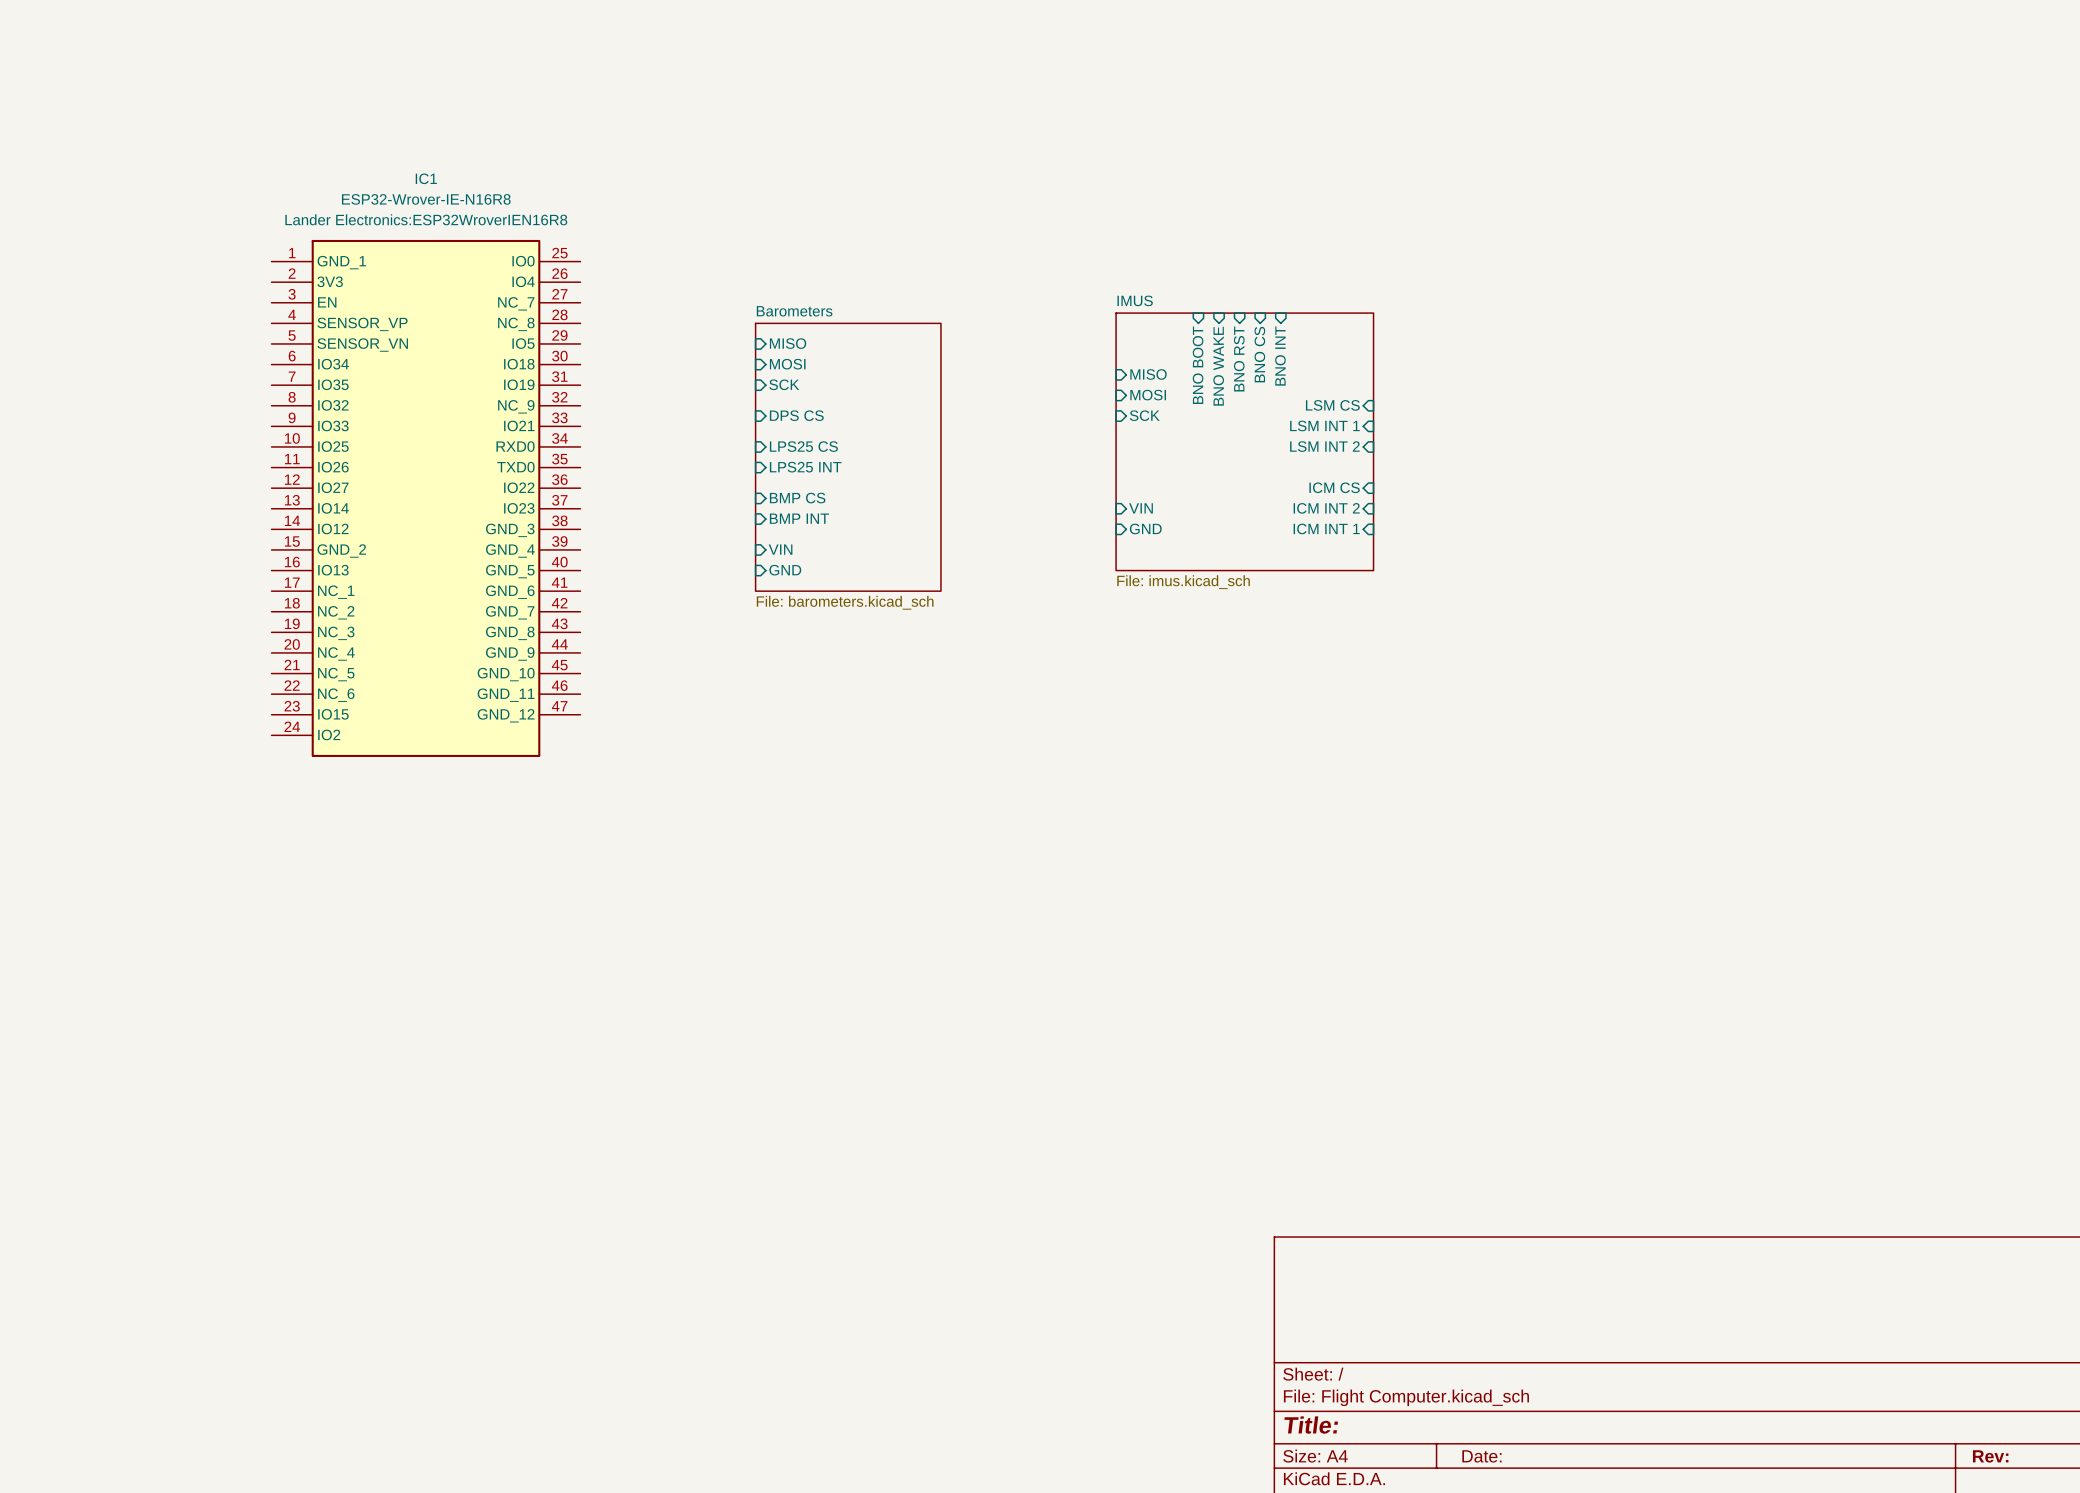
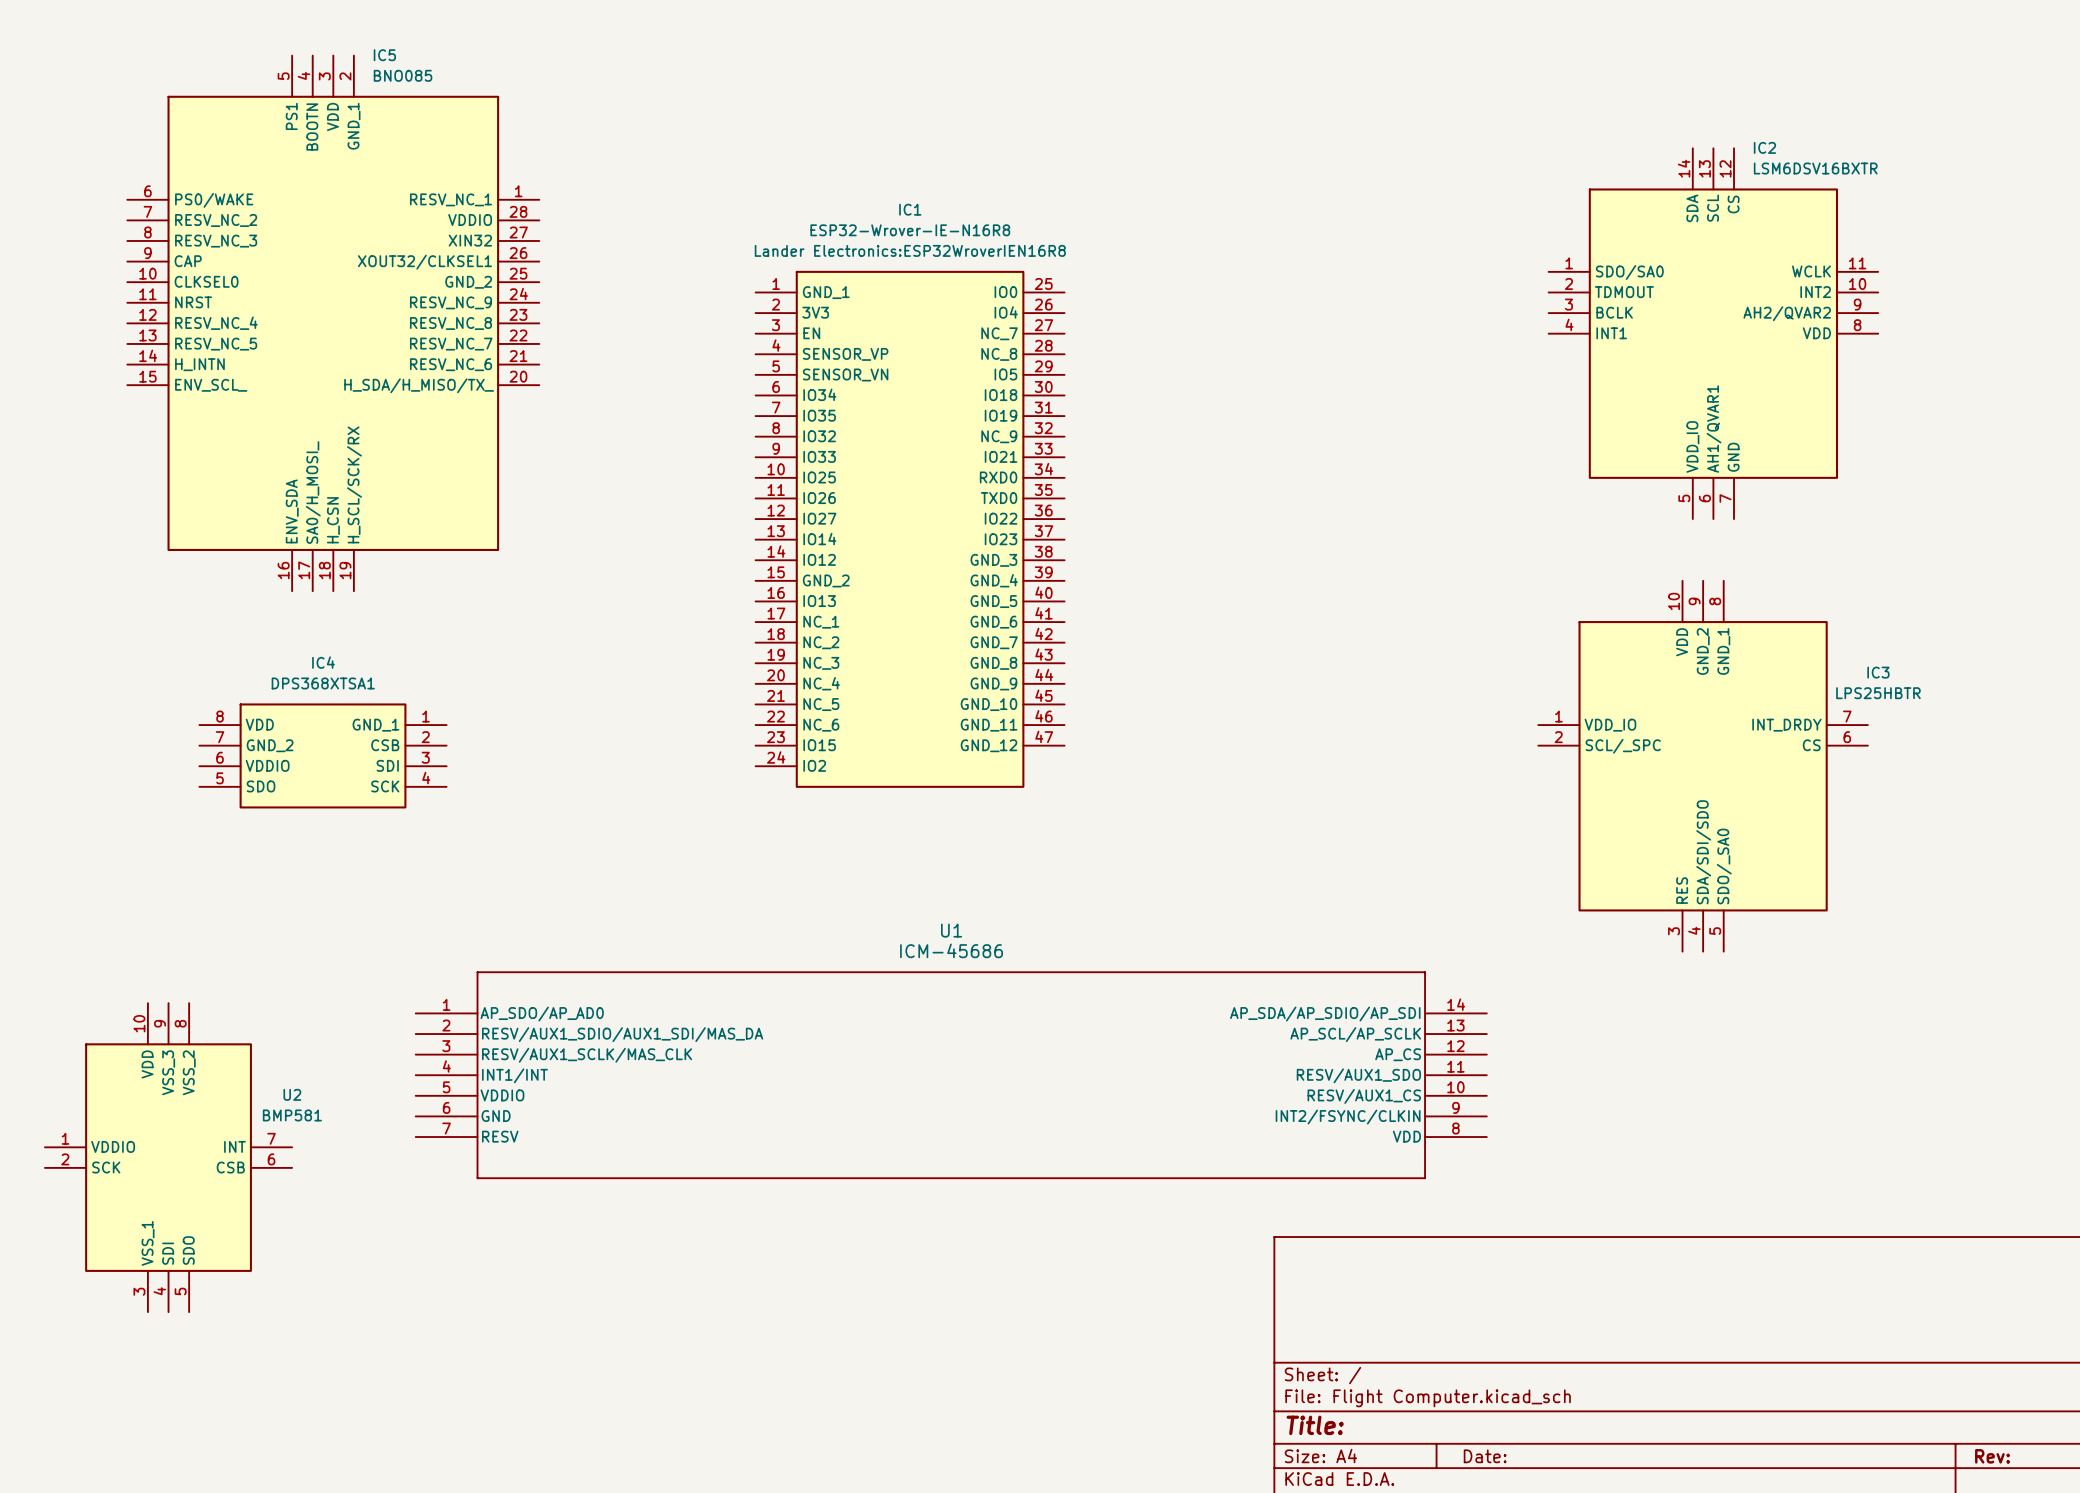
IC5: none -> BNO085 (333, 323)
IC2: none -> LSM6DSV16BXTR (1713, 333)
sheet pin: MISO (788, 343) -> none
sheet pin: BNO CS (1259, 354) -> none
sheet pin: BNO INT (1280, 356) -> none
sheet pin: BNO RST (1239, 358) -> none
sheet pin: MOSI (787, 364) -> none
sheet pin: BNO BOOT (1198, 365) -> none
sheet pin: BNO WAKE (1218, 366) -> none
sheet pin: MISO (1148, 374) -> none
sheet pin: SCK (784, 384) -> none
sheet pin: MOSI (1148, 395) -> none
sheet pin: LSM CS (1332, 405) -> none
sheet pin: DPS CS (796, 415) -> none
sheet pin: SCK (1144, 415) -> none
sheet pin: LSM INT 1 (1324, 425) -> none
sheet IMUS: File: imus.kicad_sch (1244, 441) -> none
sheet pin: LPS25 CS (803, 446) -> none
sheet pin: LSM INT 2 (1324, 446) -> none
sheet Barometers: File: barometers.kicad_sch (848, 457) -> none
sheet pin: LPS25 INT (805, 467) -> none
sheet pin: ICM CS (1334, 487) -> none
IC1 position: (426, 498) -> (910, 529)
sheet pin: BMP CS (797, 498) -> none
sheet pin: VIN (1141, 508) -> none
sheet pin: ICM INT 2 (1326, 508) -> none
sheet pin: BMP INT (799, 518) -> none
sheet pin: GND (1145, 528) -> none
sheet pin: ICM INT 1 (1326, 528) -> none
sheet pin: VIN (780, 549) -> none
sheet pin: GND (785, 570) -> none
IC4: none -> DPS368XTSA1 (323, 755)
IC3: none -> LPS25HBTR (1703, 766)
U1: none -> ICM-45686 (951, 1075)
U2: none -> BMP581 (168, 1157)

